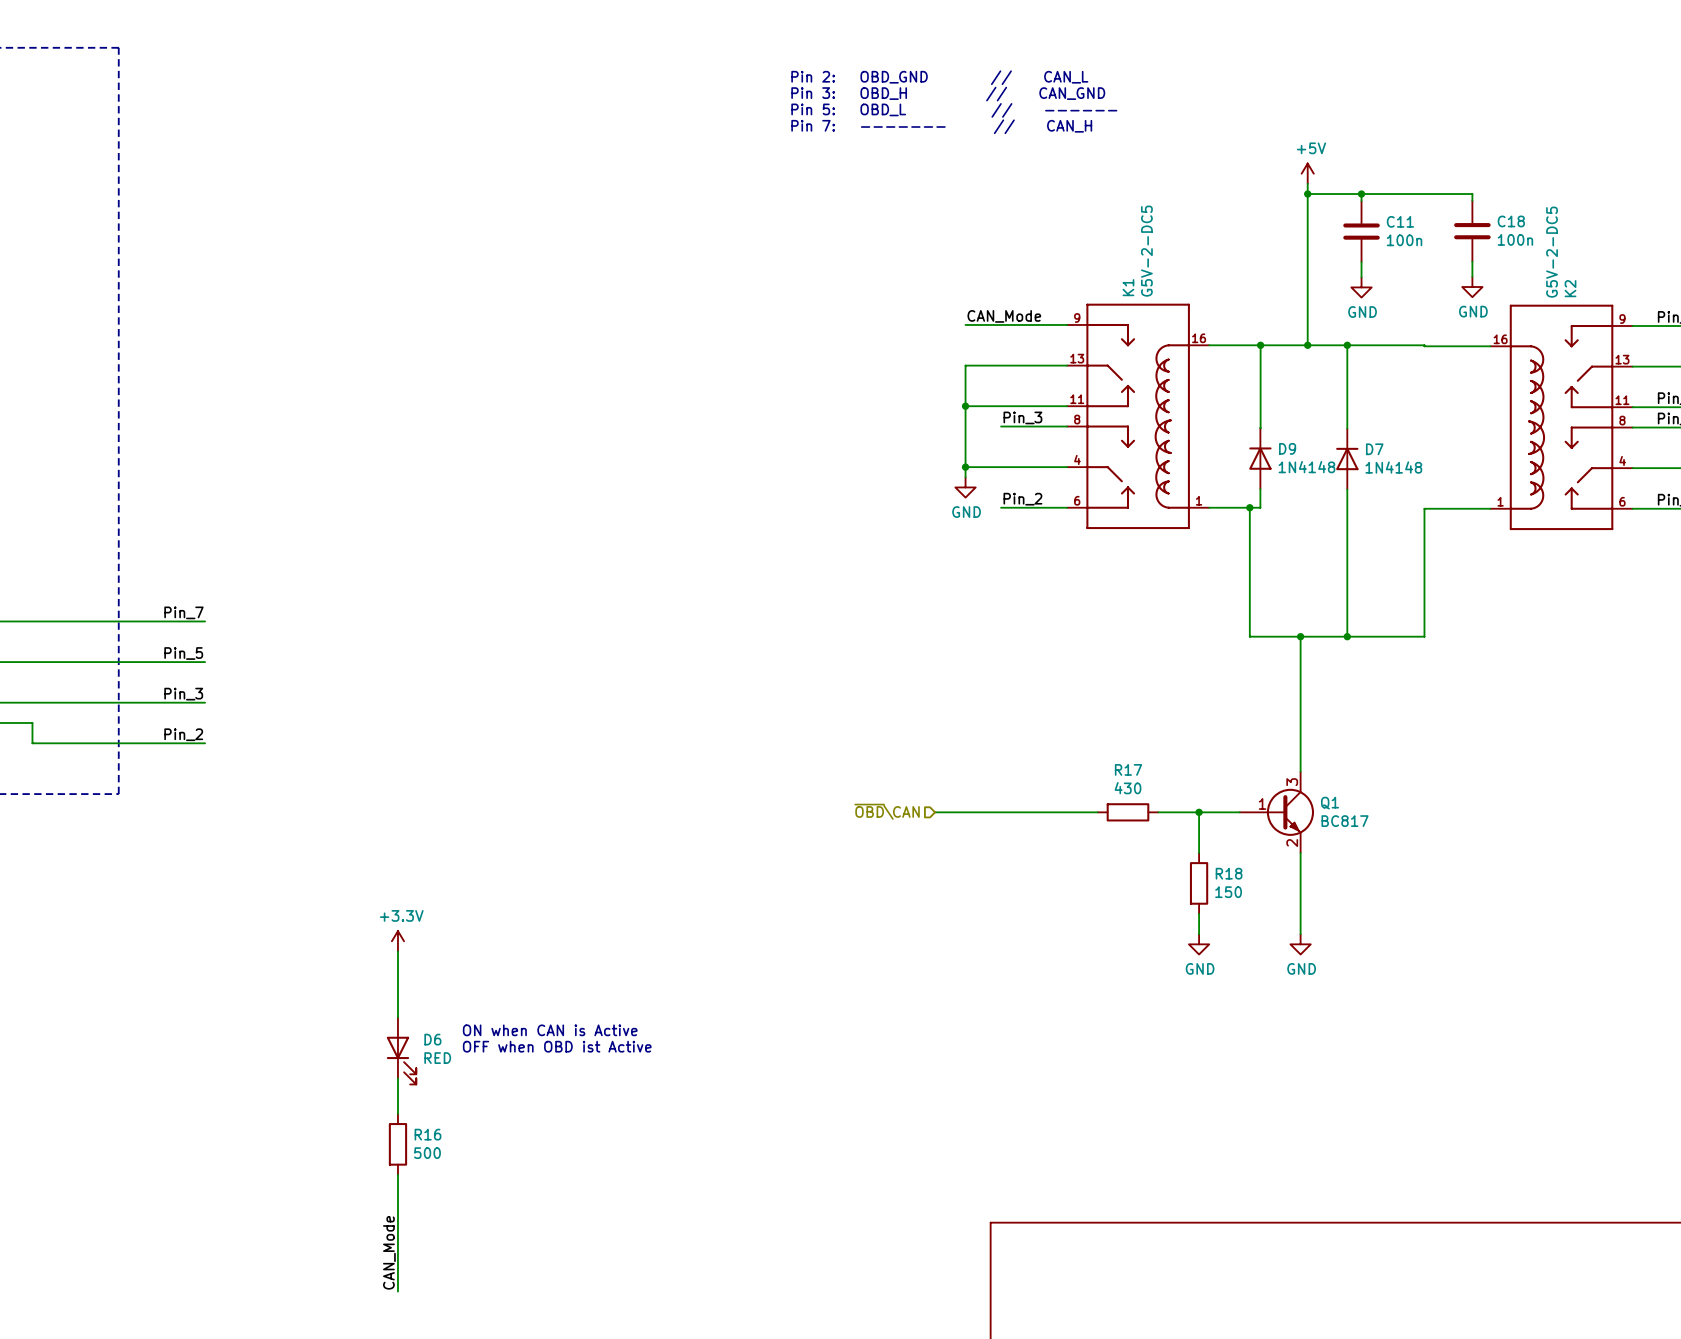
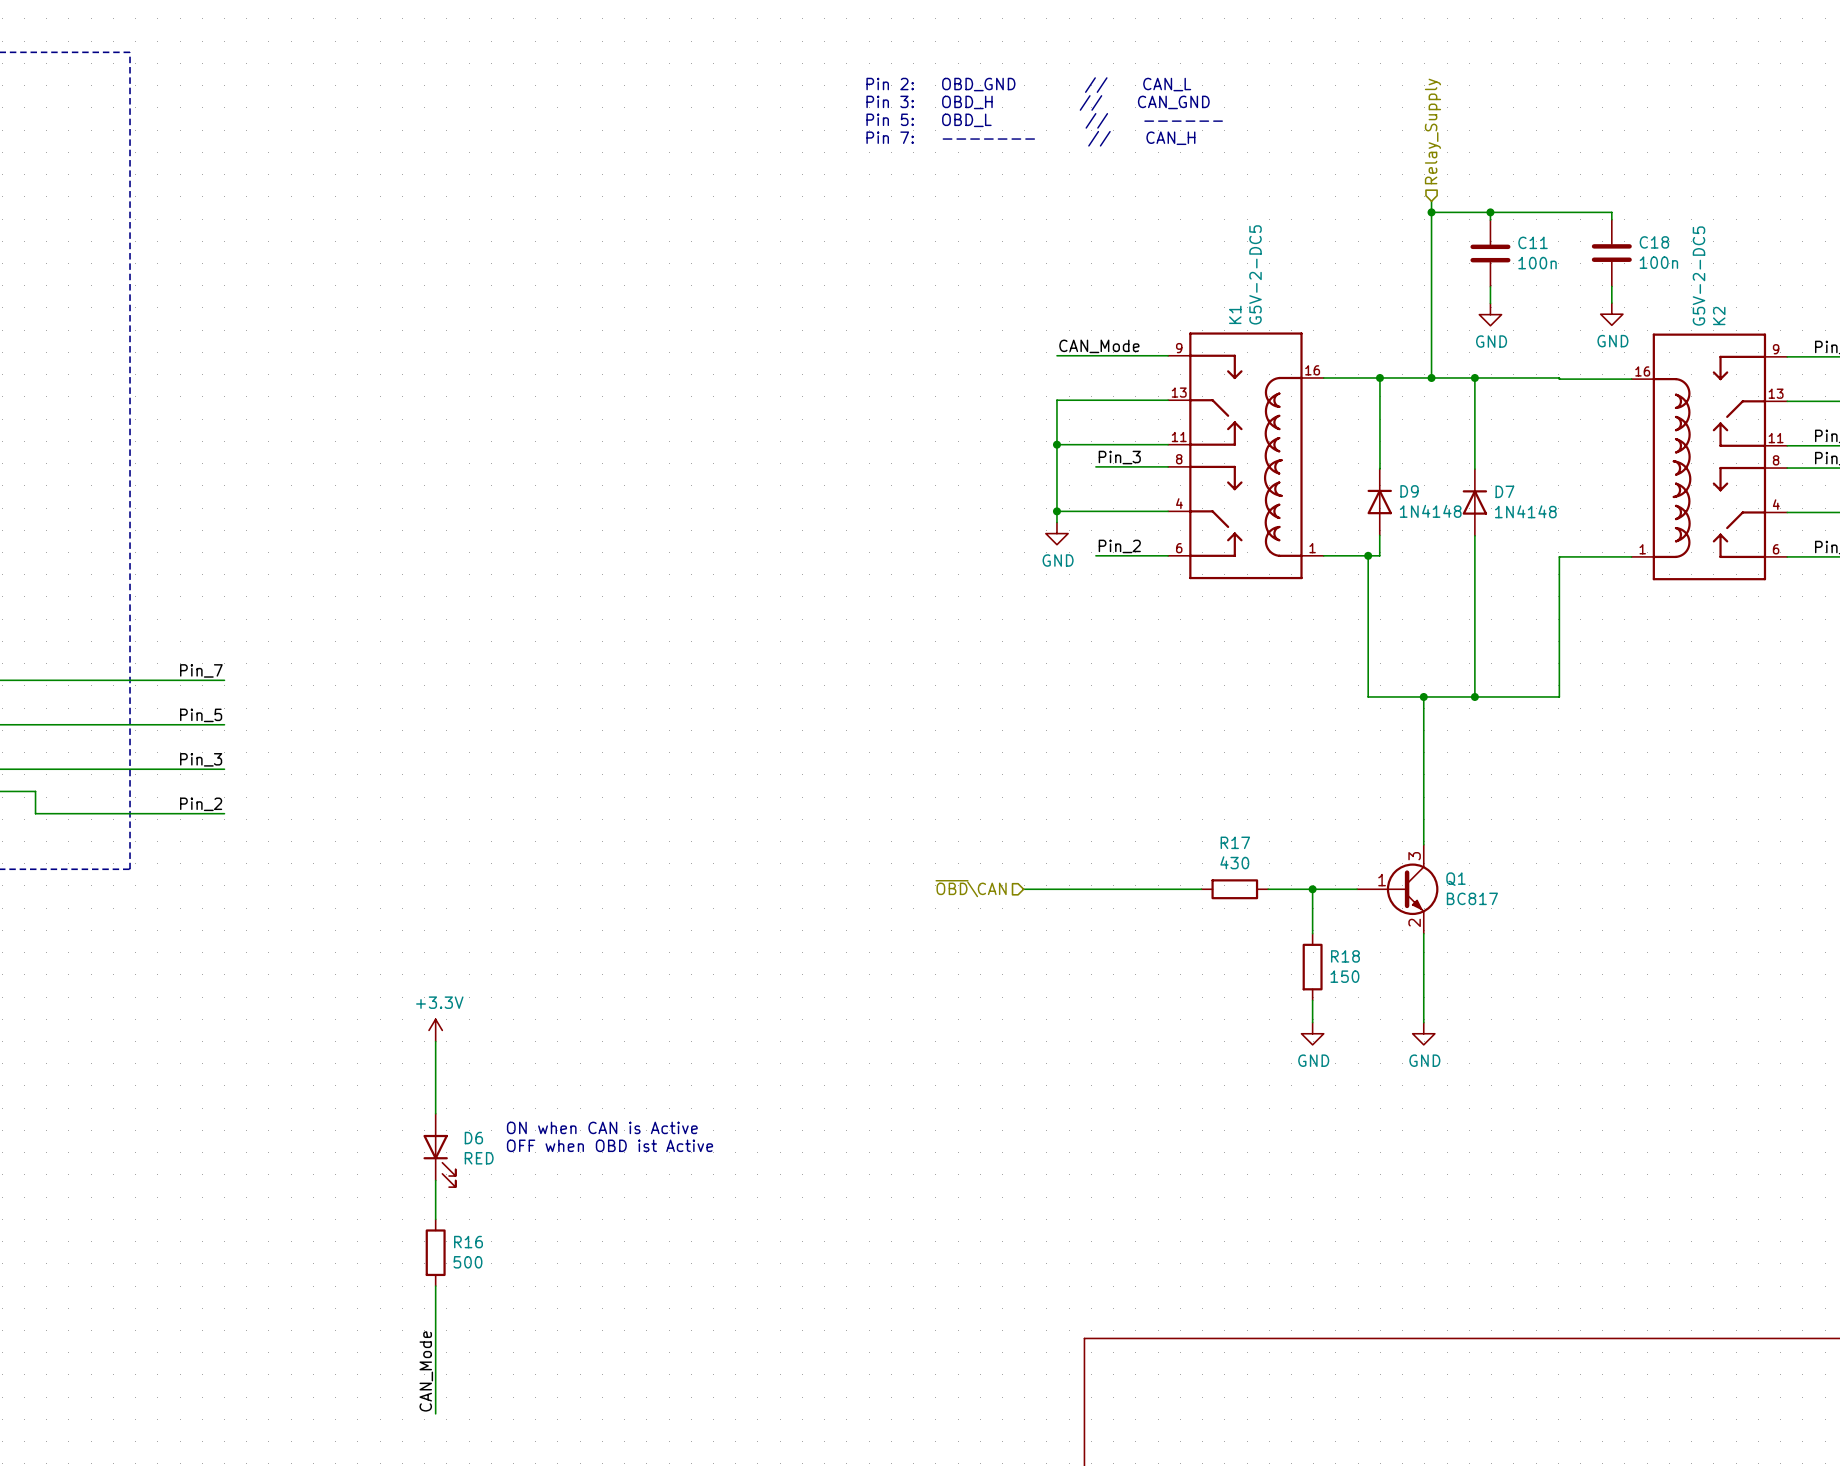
hierarchical label: none -> Relay_Supply (1432, 131)
power symbol: +5V (1307, 173) -> none

